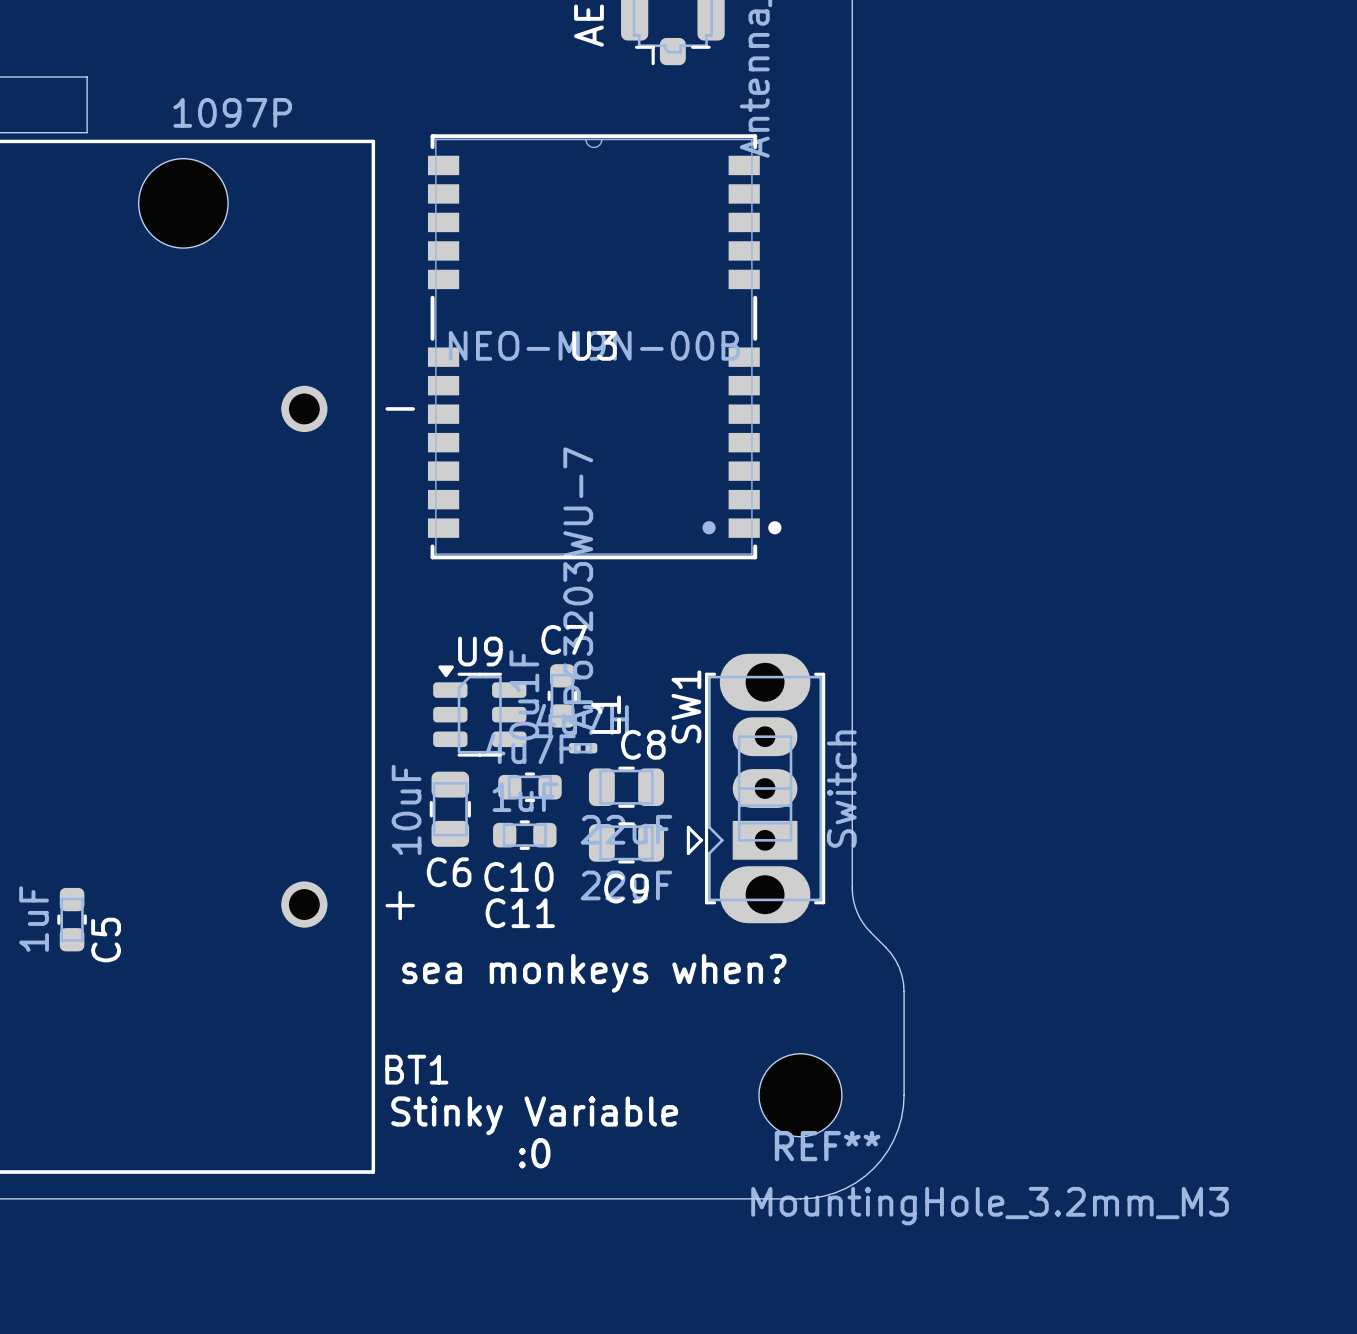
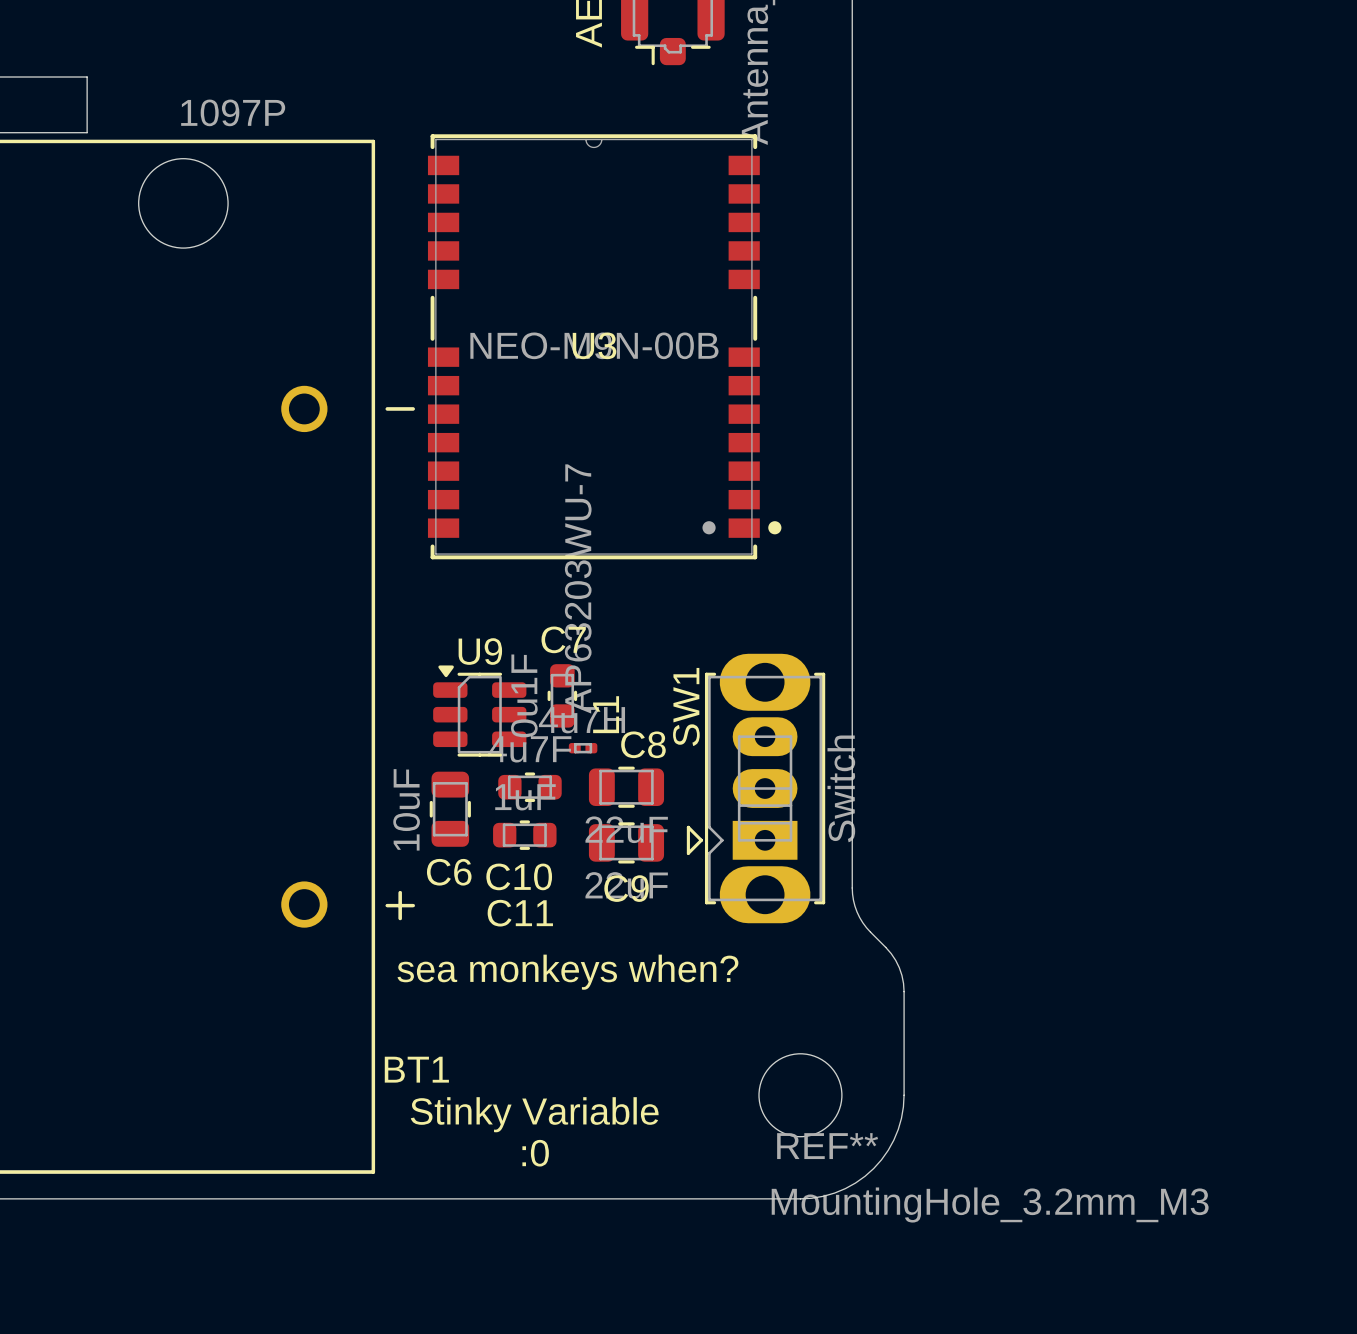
C5: 1uF (72, 919) -> none

